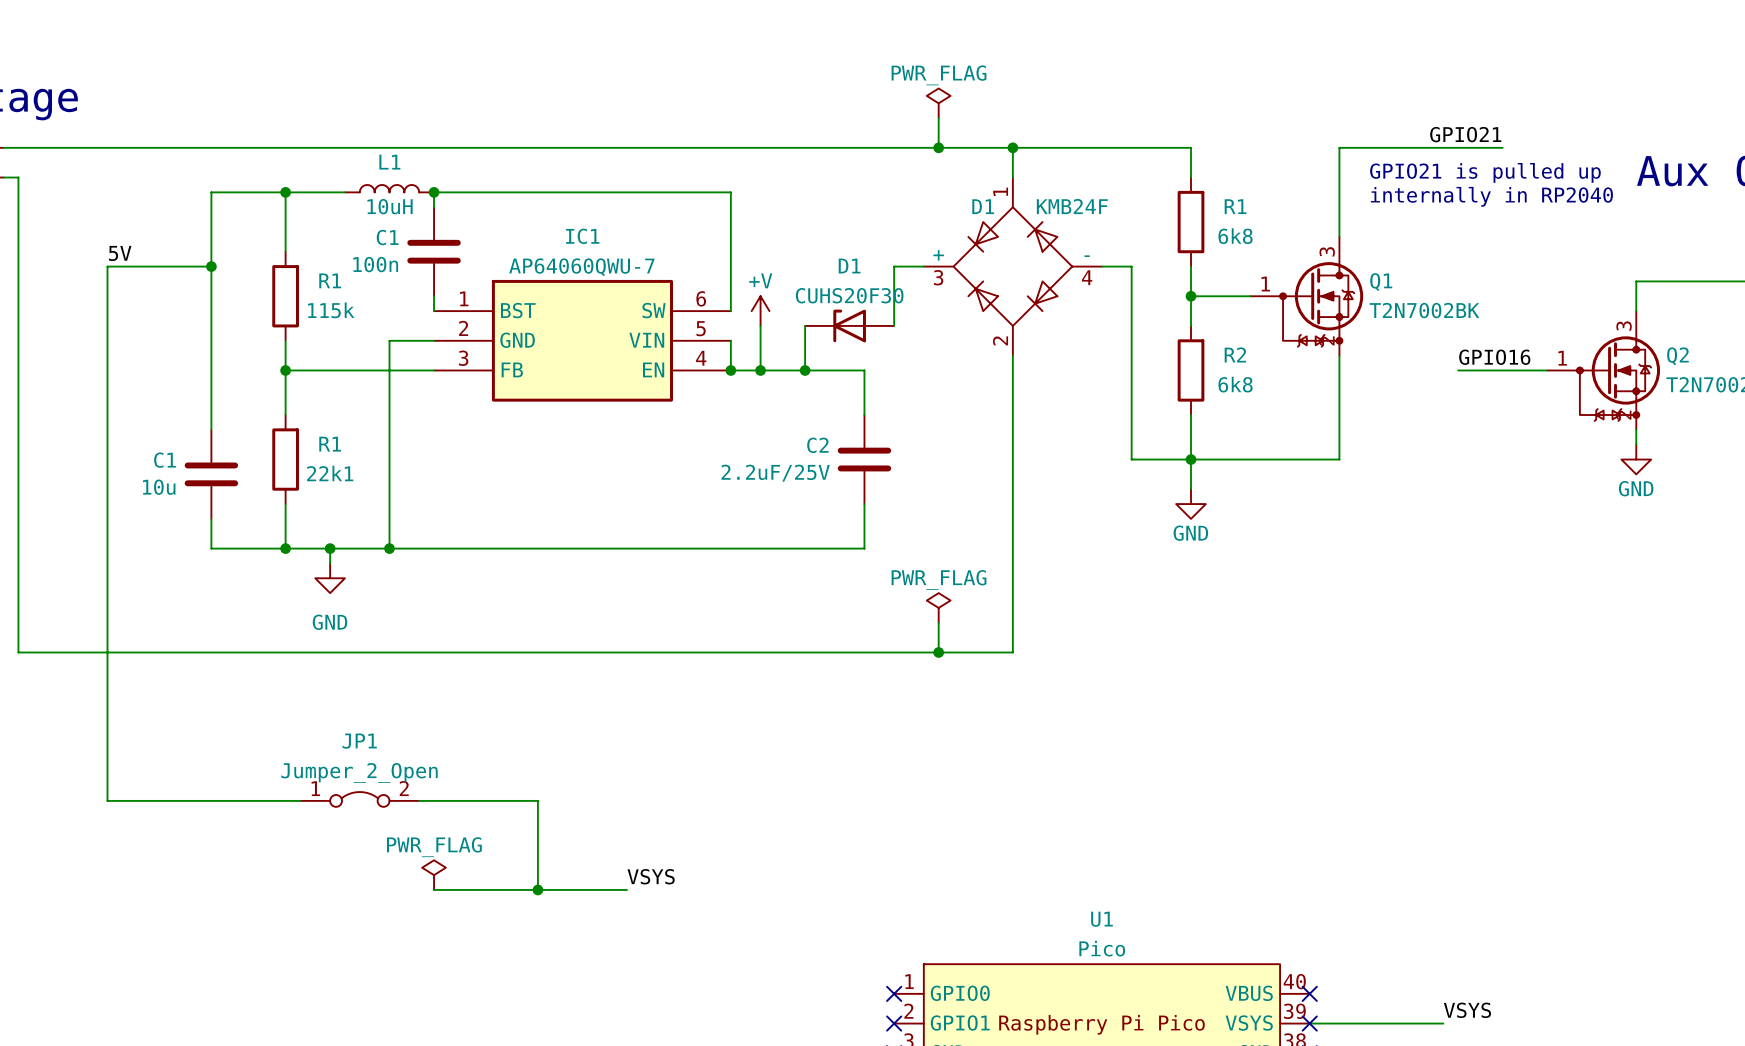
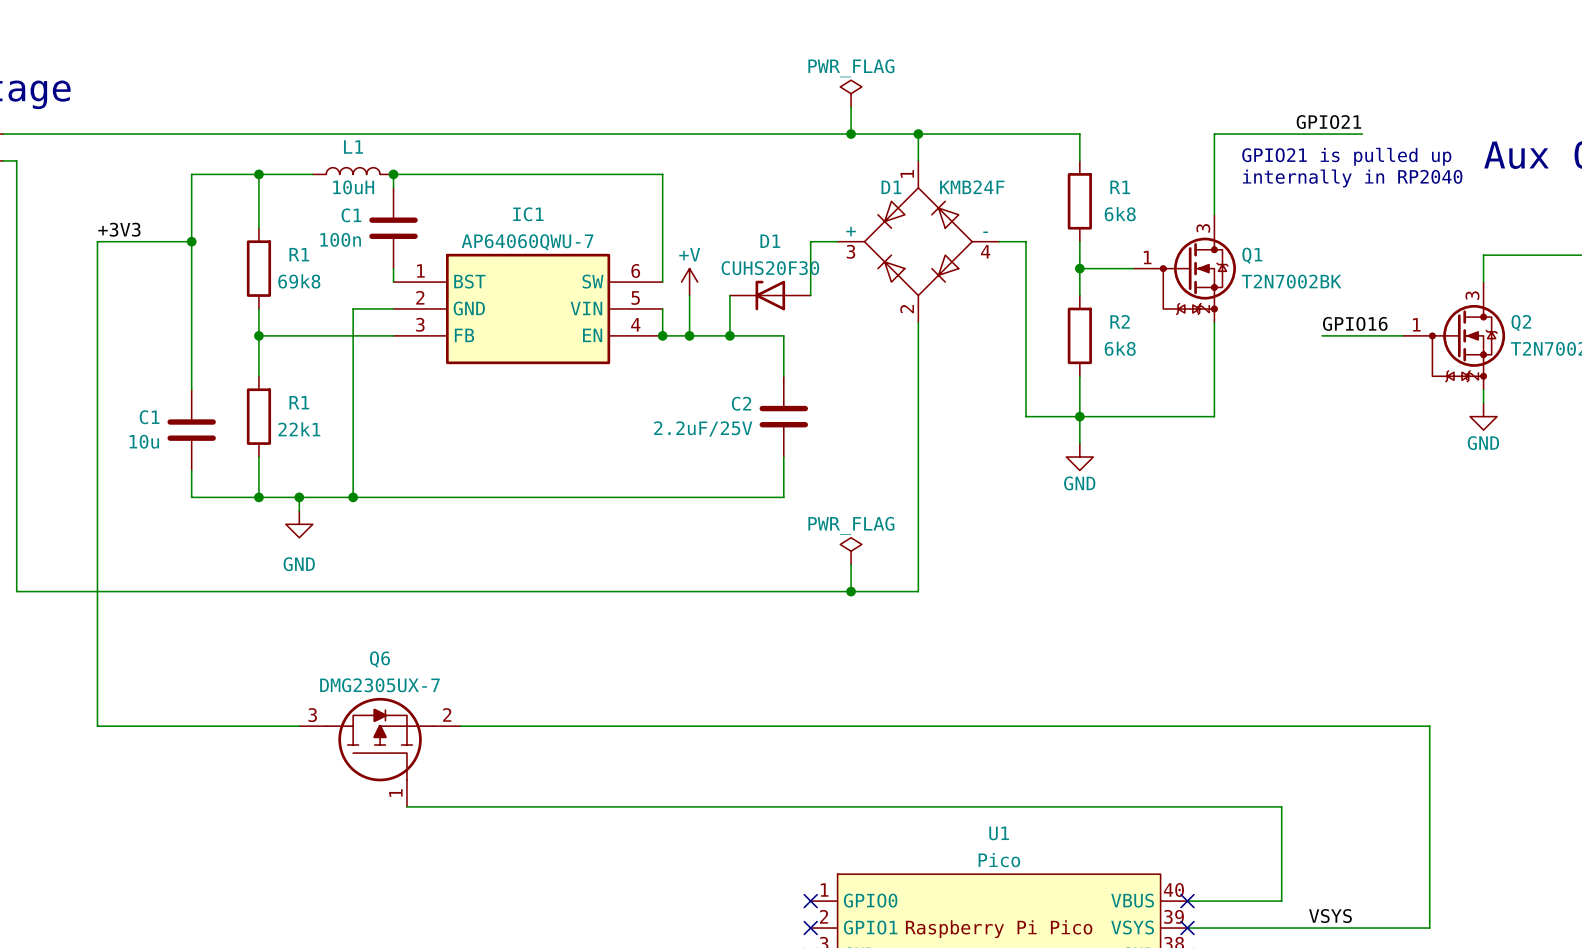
label: 5V (120, 253) -> +3V3 (119, 229)
R1 value: 115k (331, 310) -> 69k8 (299, 281)
JP1: Jumper_2_Open (359, 799) -> none
wire: (537, 800) (537, 889) -> (487, 726) (1429, 726) (1429, 928) (1308, 928)
Q6: none -> DMG2305UX-7 (380, 752)
power symbol: PWR_FLAG (434, 875) -> none
label: VSYS (651, 876) -> none
wire: (434, 889) (448, 889) -> none
junction: (537, 889) -> none
wire: none -> (568, 806) (1281, 806) (1281, 901) (1187, 901)

